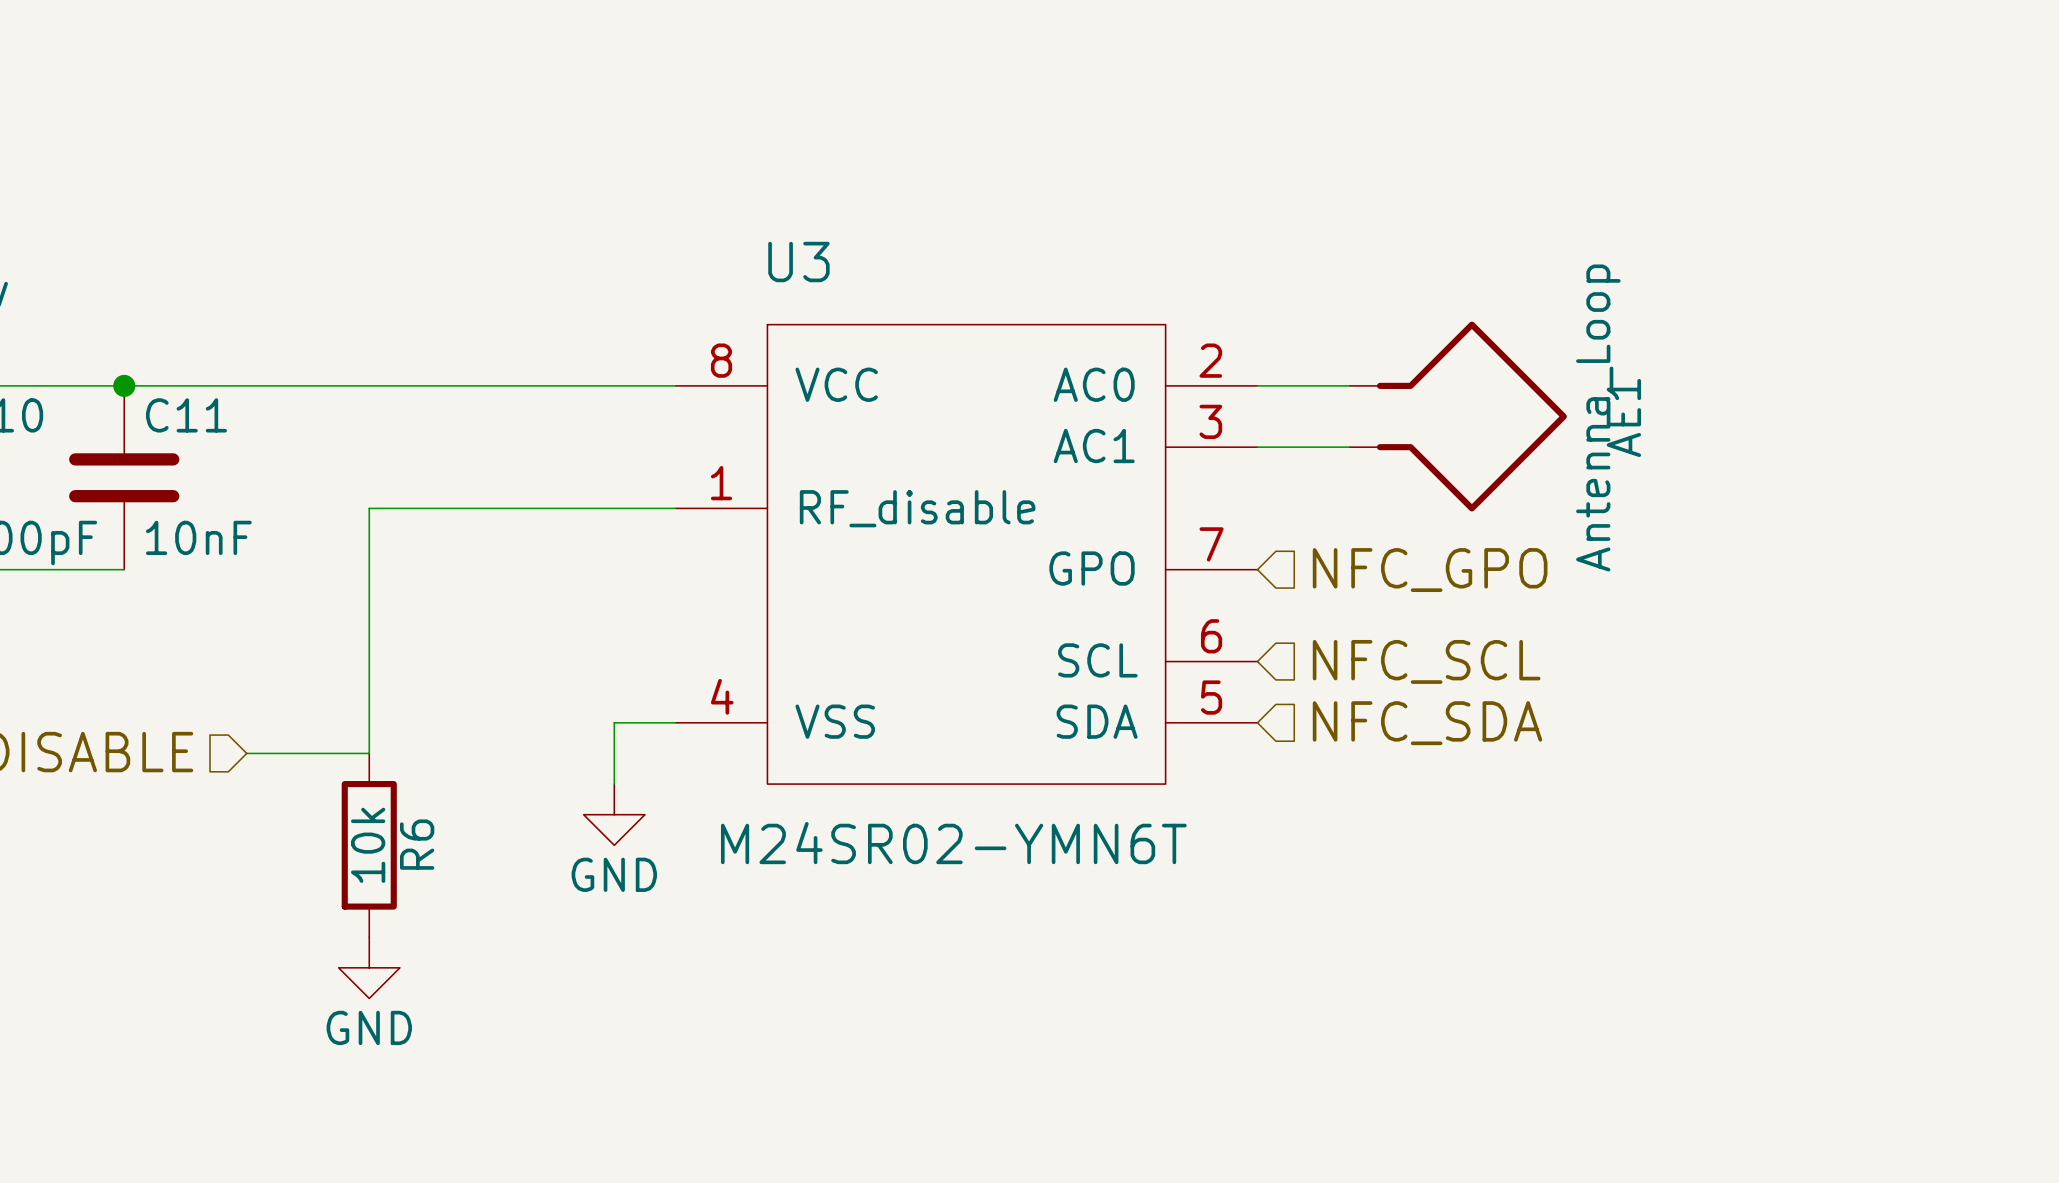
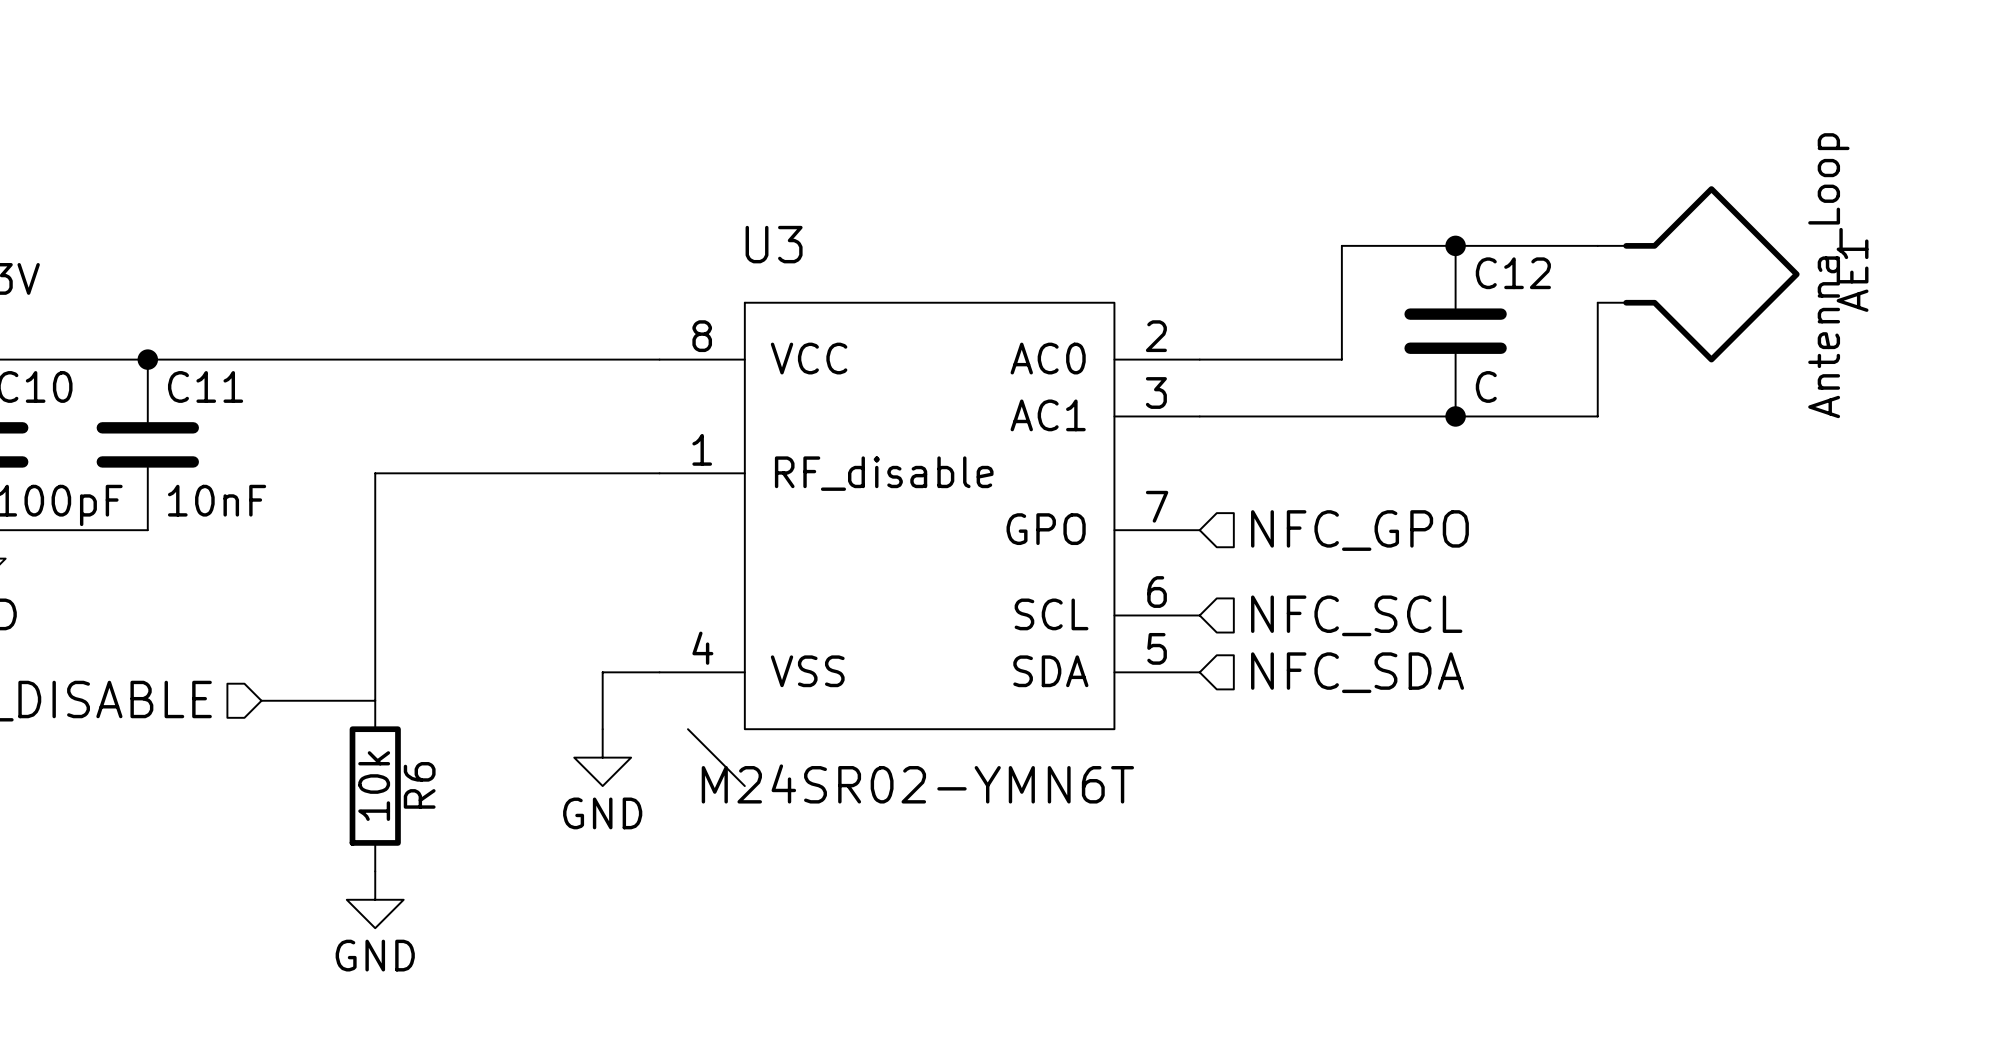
junction: none -> (1455, 245)
wire: none -> (1597, 245) (1341, 245) (1341, 359) (1285, 359)
wire: none -> (1597, 302) (1597, 416) (1285, 416)
C12: none -> C (1455, 331)
AE1 position: (1458, 416) -> (1698, 274)
junction: none -> (1455, 416)
wire: none -> (687, 729) (744, 786)

